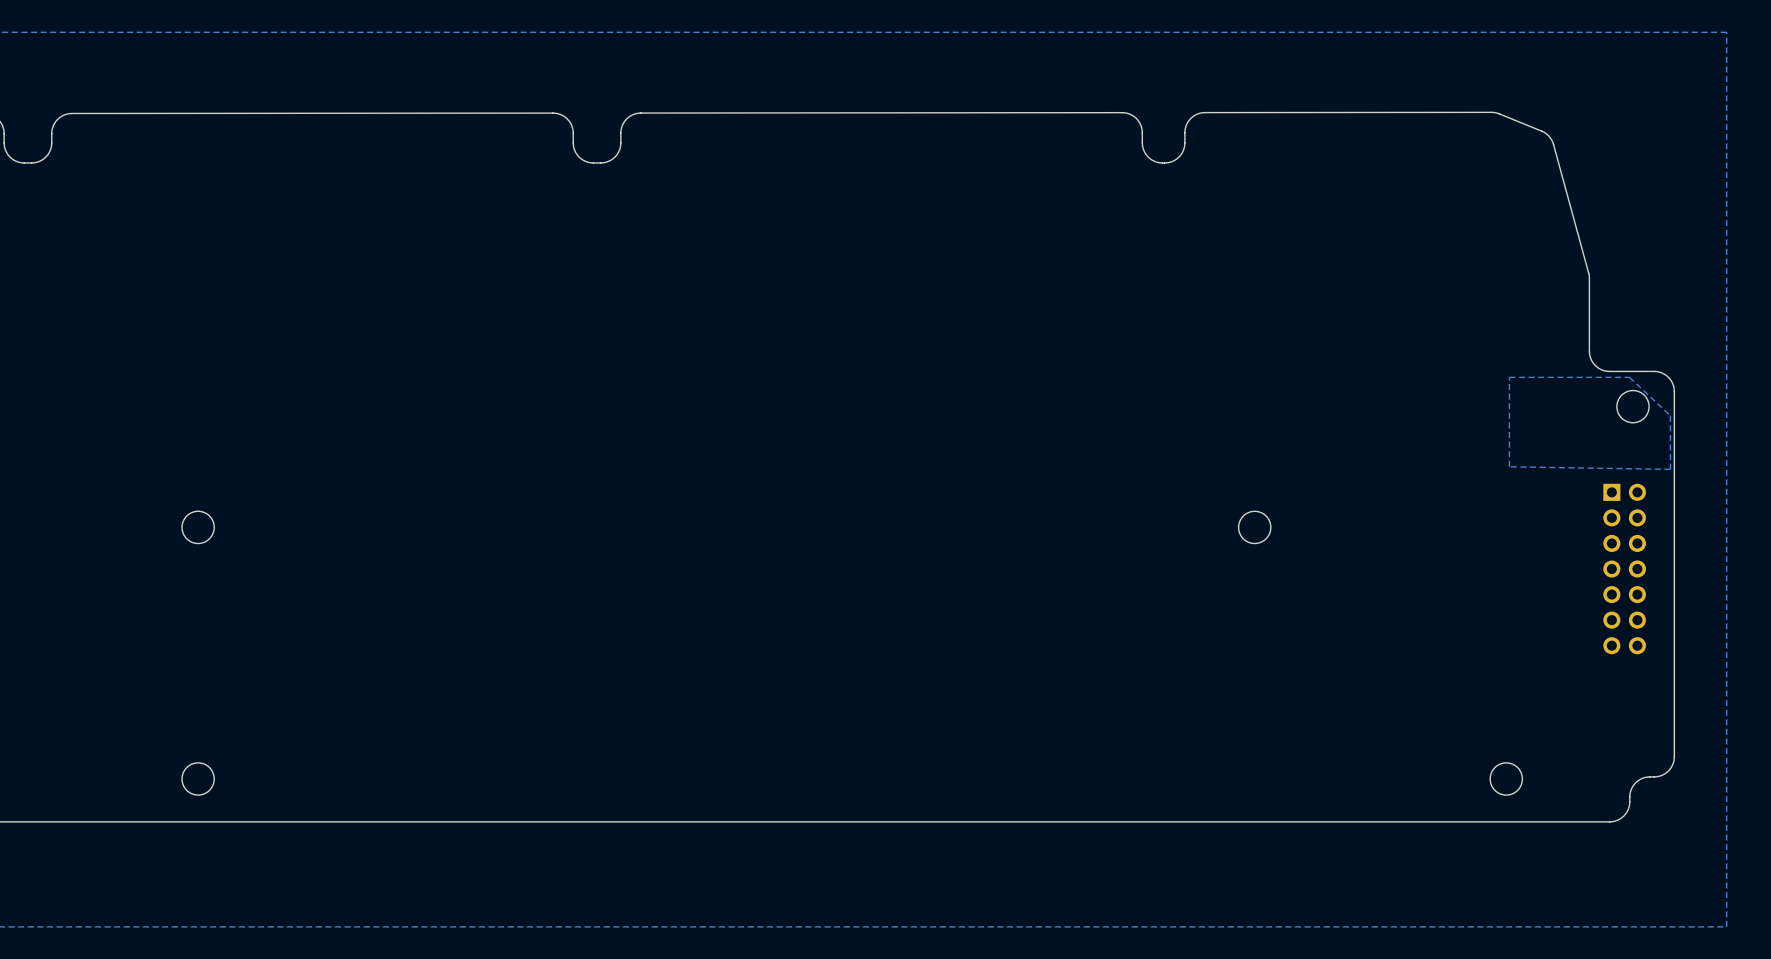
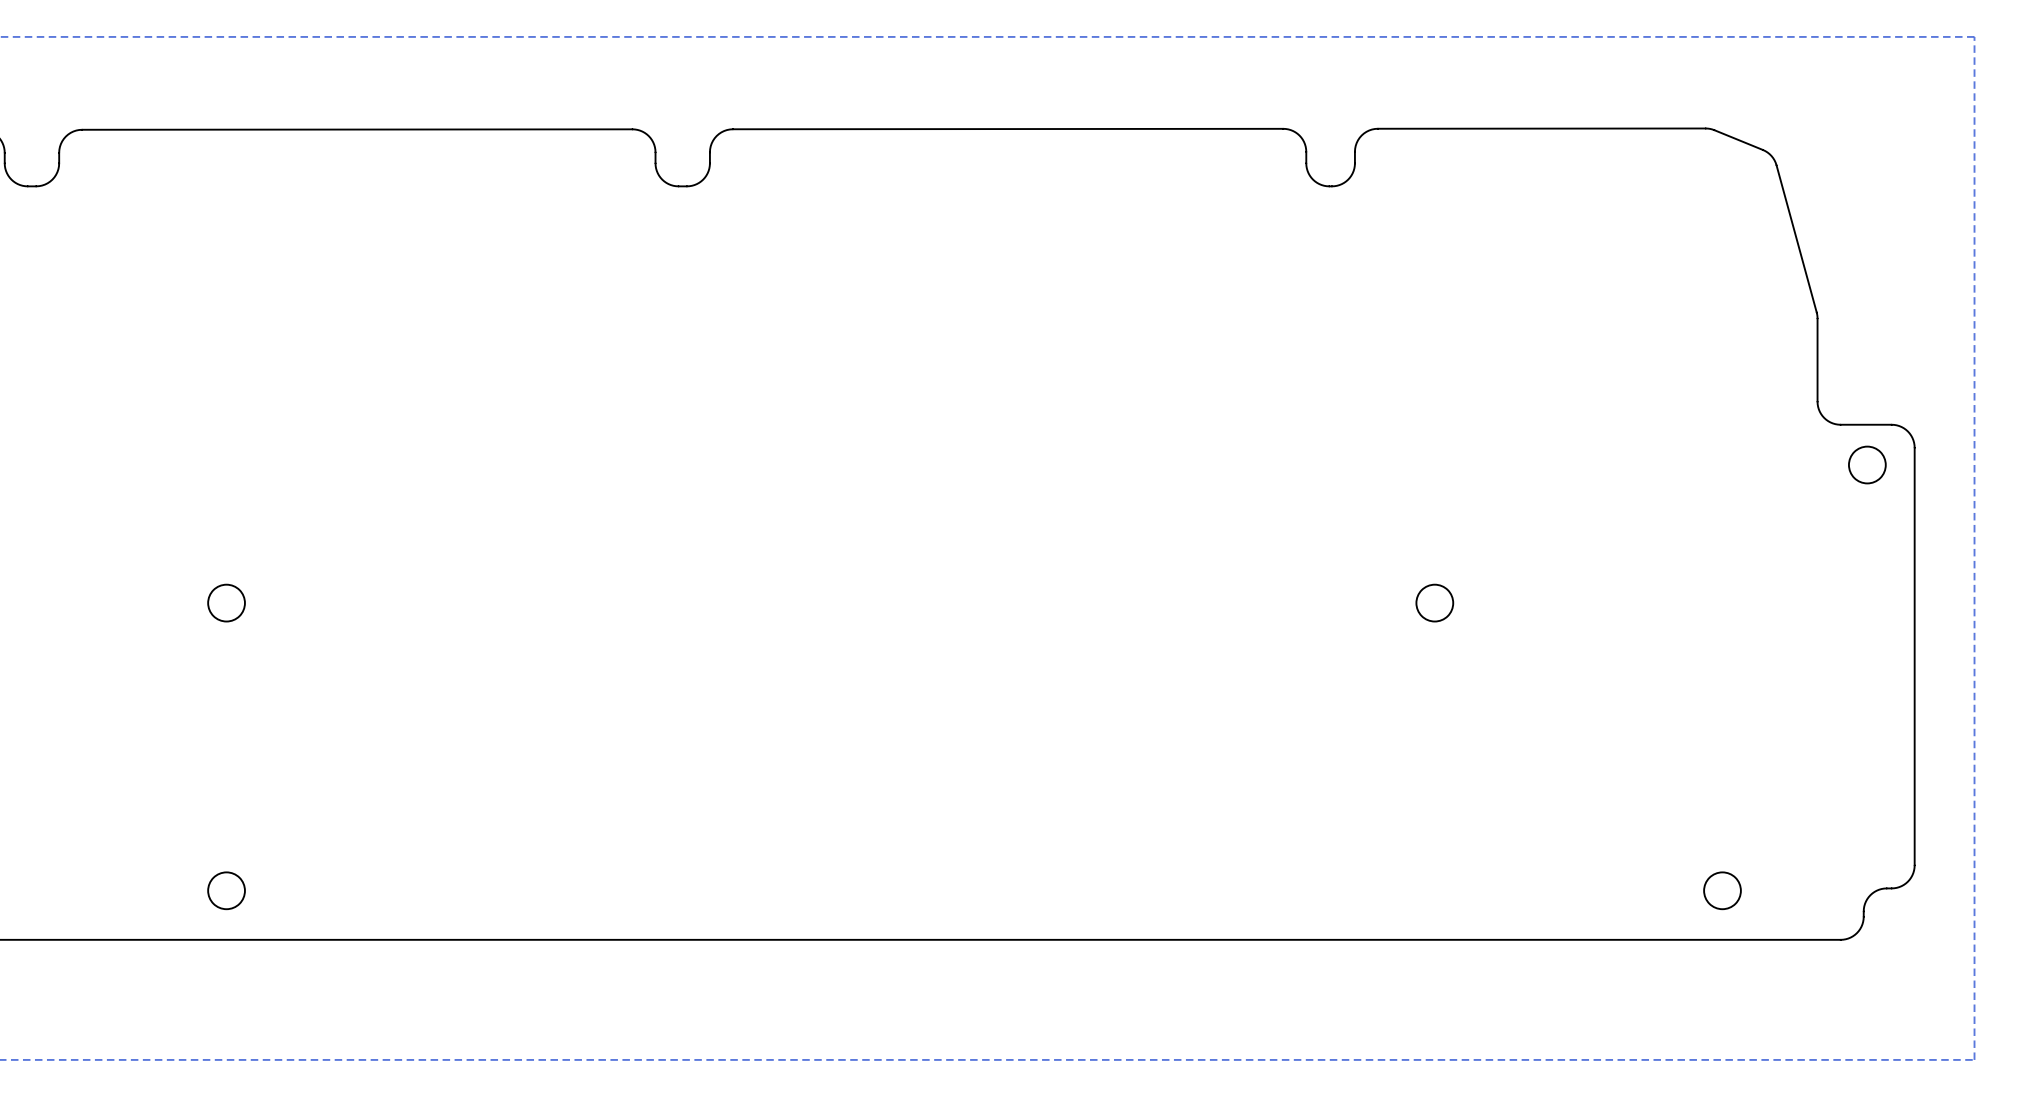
zone outline: (1629, 377) (1509, 377) (1509, 466) (1670, 469) (1670, 415) (1629, 377) -> none
part: (1624, 569) -> none

